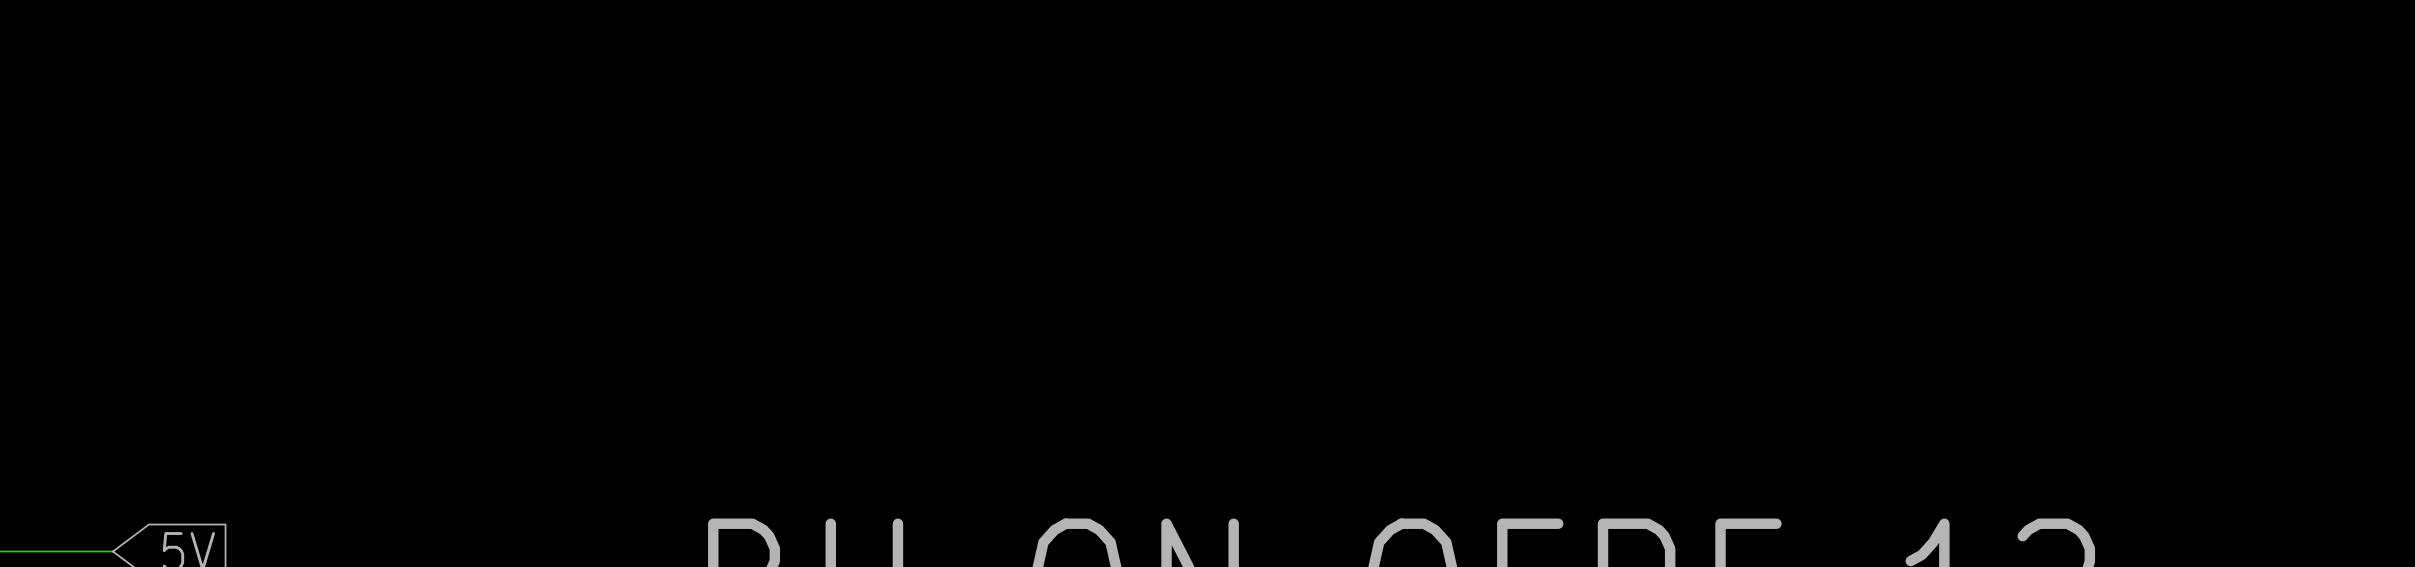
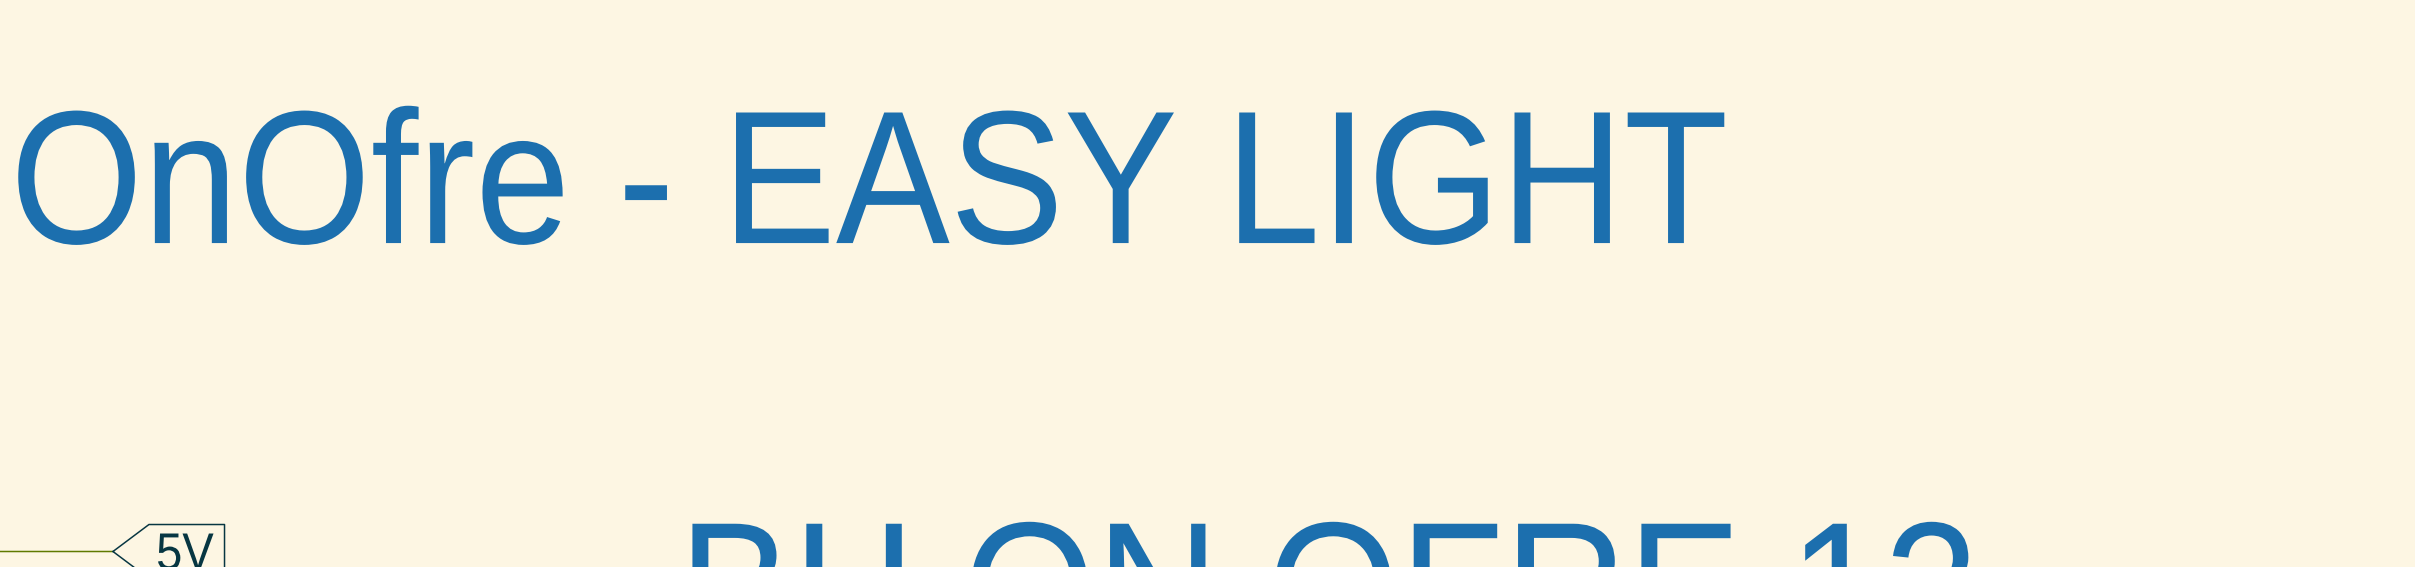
text: none -> OnOfre - EASY LIGHT (871, 175)

